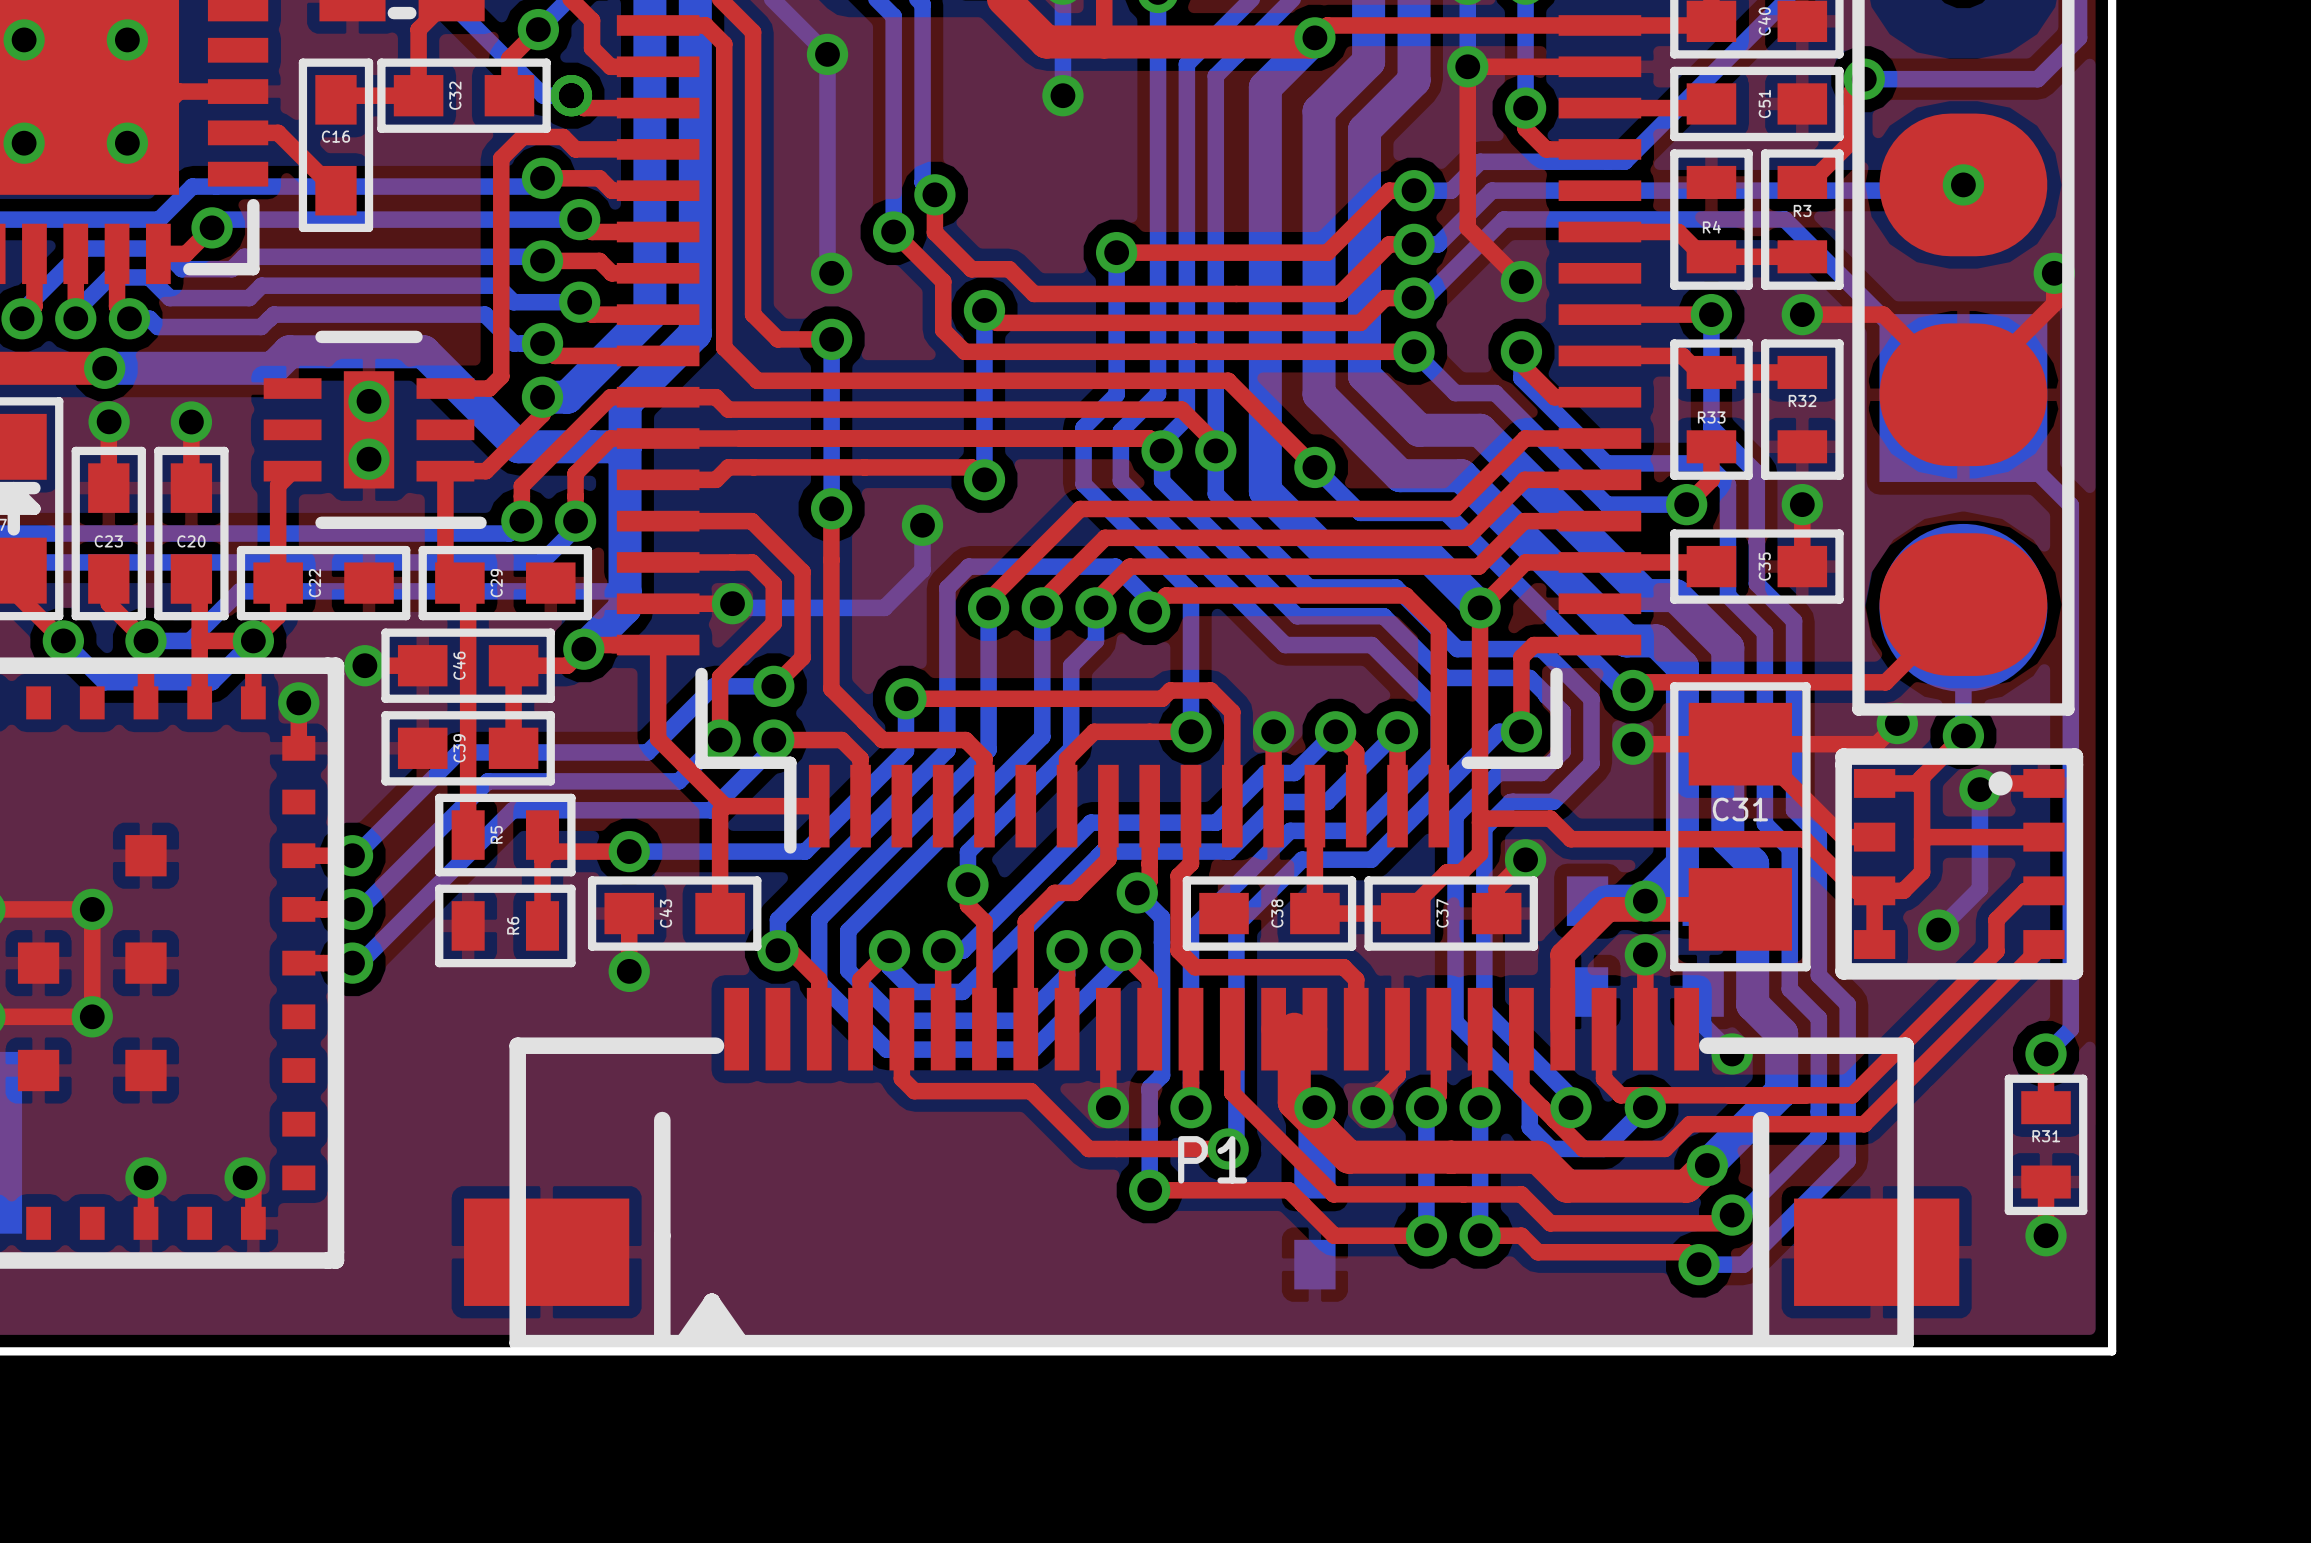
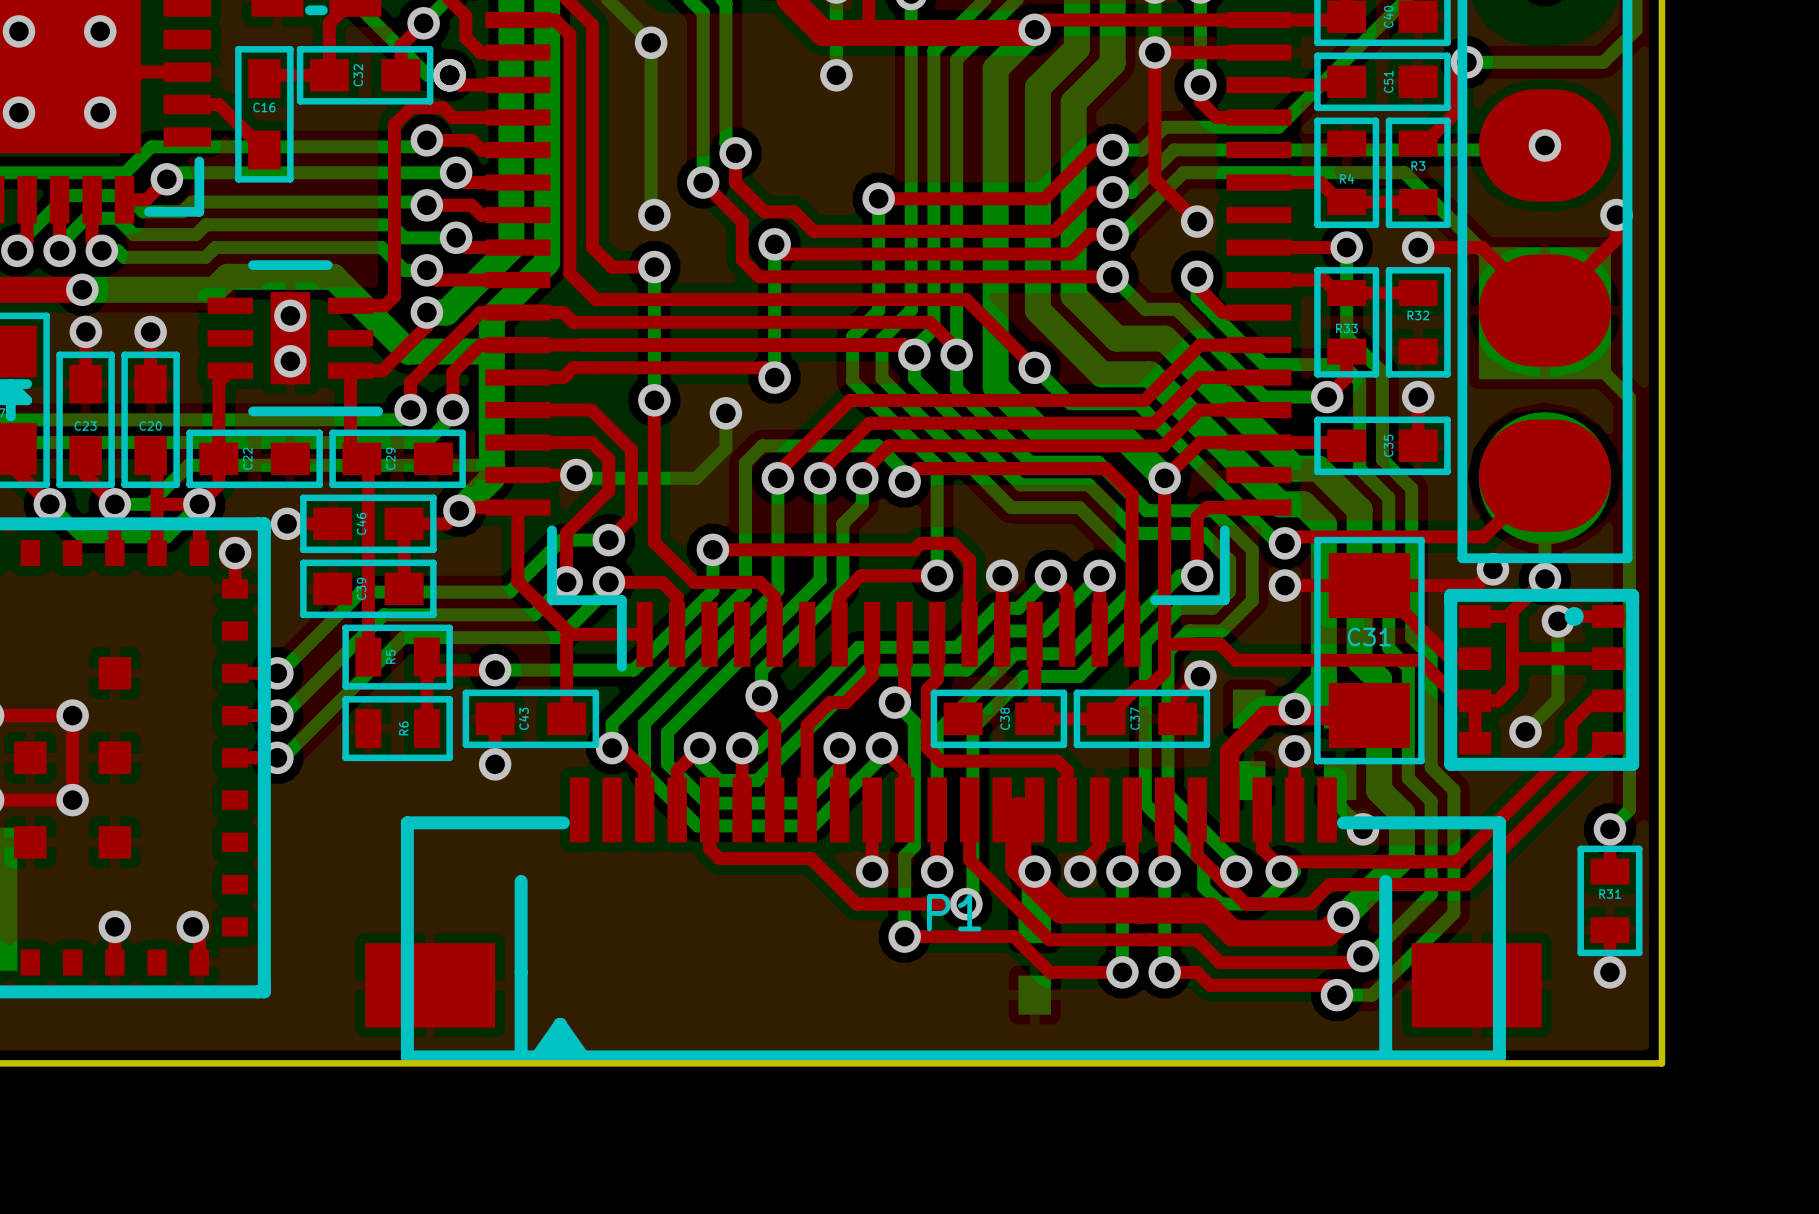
via position: (1645, 1107) -> (1281, 871)

